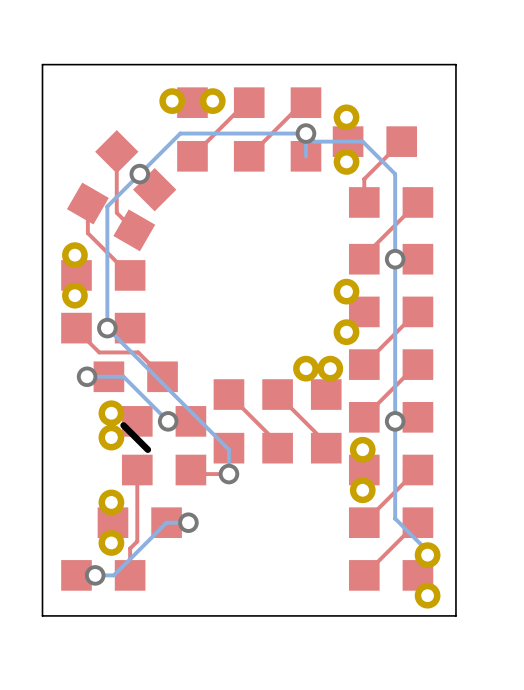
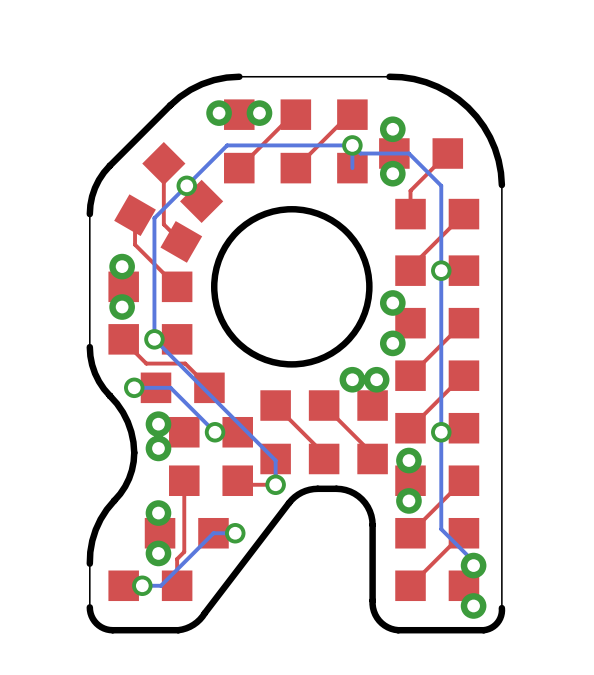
board edge: (192, 64) (42, 64) (42, 202) -> (239, 76) (226, 77) (201, 84) (190, 89) (170, 105) (103, 172) (95, 187) (89, 214)
board edge: (343, 64) (455, 64) (455, 173) -> (389, 76) (426, 82) (448, 92) (468, 107) (490, 137) (498, 160) (501, 185)
round board edge: none -> [211, 206, 373, 368]
board edge: (42, 335) (42, 553) -> (114, 500) (100, 519) (95, 529) (90, 552) (89, 563)
board edge: none -> (89, 347) (95, 373) (109, 395)
board edge: none -> (109, 395) (127, 421) (134, 452) (129, 478) (114, 500)
line: (123, 425) (147, 449) -> none
board edge: (42, 597) (42, 615) (455, 615) (455, 597) -> (89, 607) (91, 616) (96, 623) (109, 630) (178, 630) (190, 626) (202, 616) (291, 499) (309, 489) (336, 488) (350, 491) (358, 496) (369, 511) (372, 524) (373, 607) (377, 617) (384, 625) (398, 630) (483, 630) (491, 627) (497, 622) (501, 615) (501, 608)

